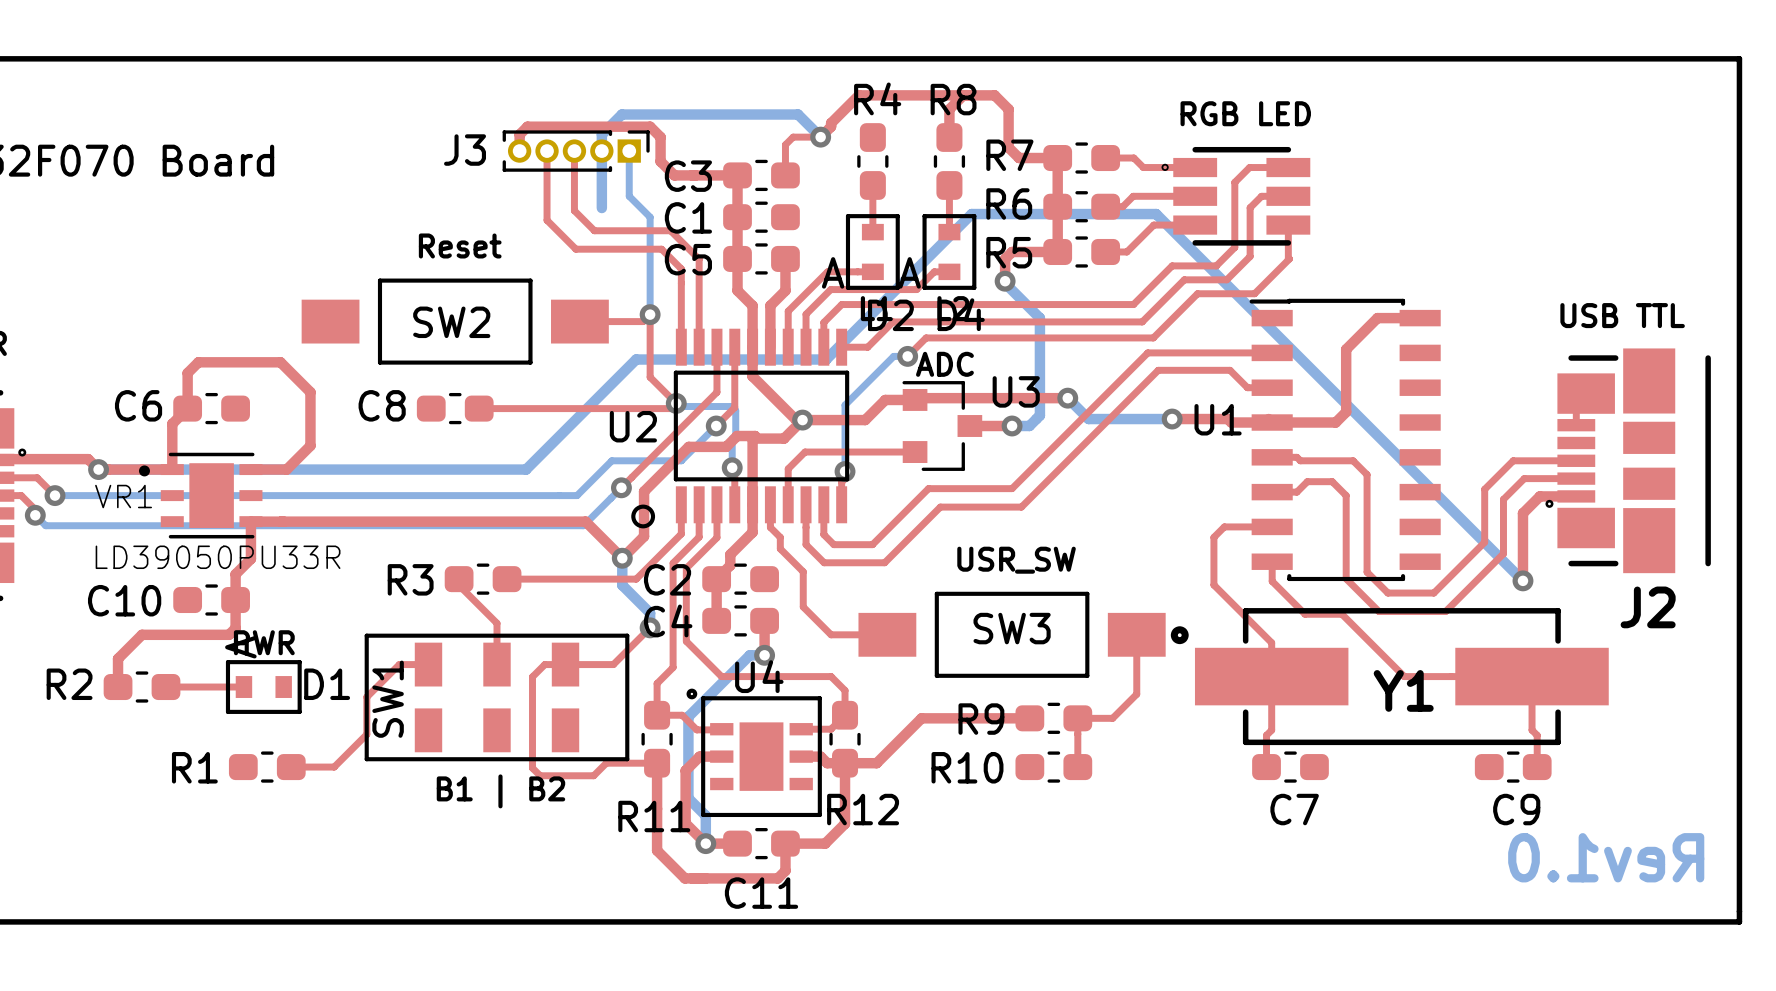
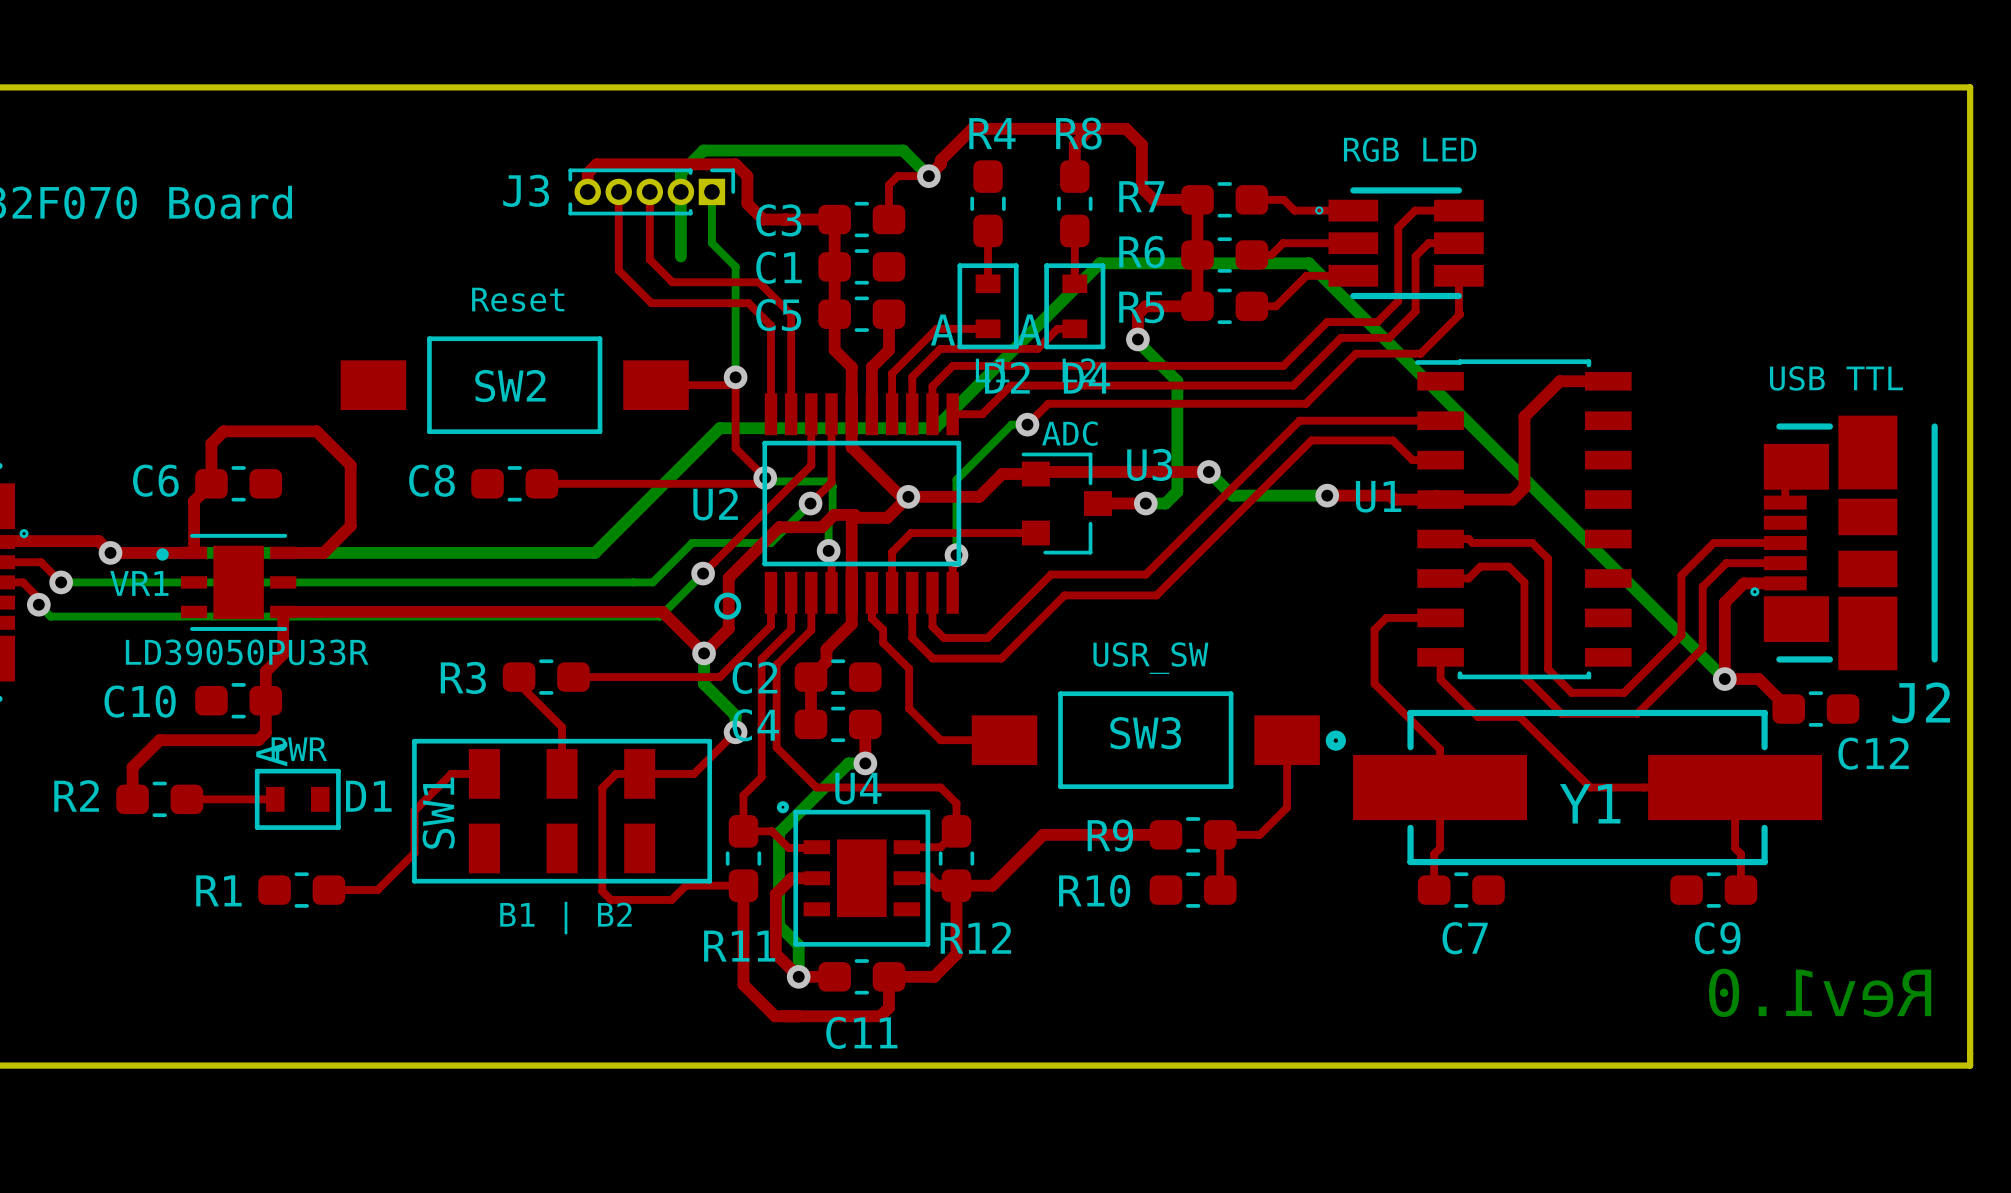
top track: none -> (1724, 679) (1758, 679) (1788, 709)
C12: none -> (1815, 709)
J2 name position: J2 (1648, 607) -> J2 (1921, 702)

